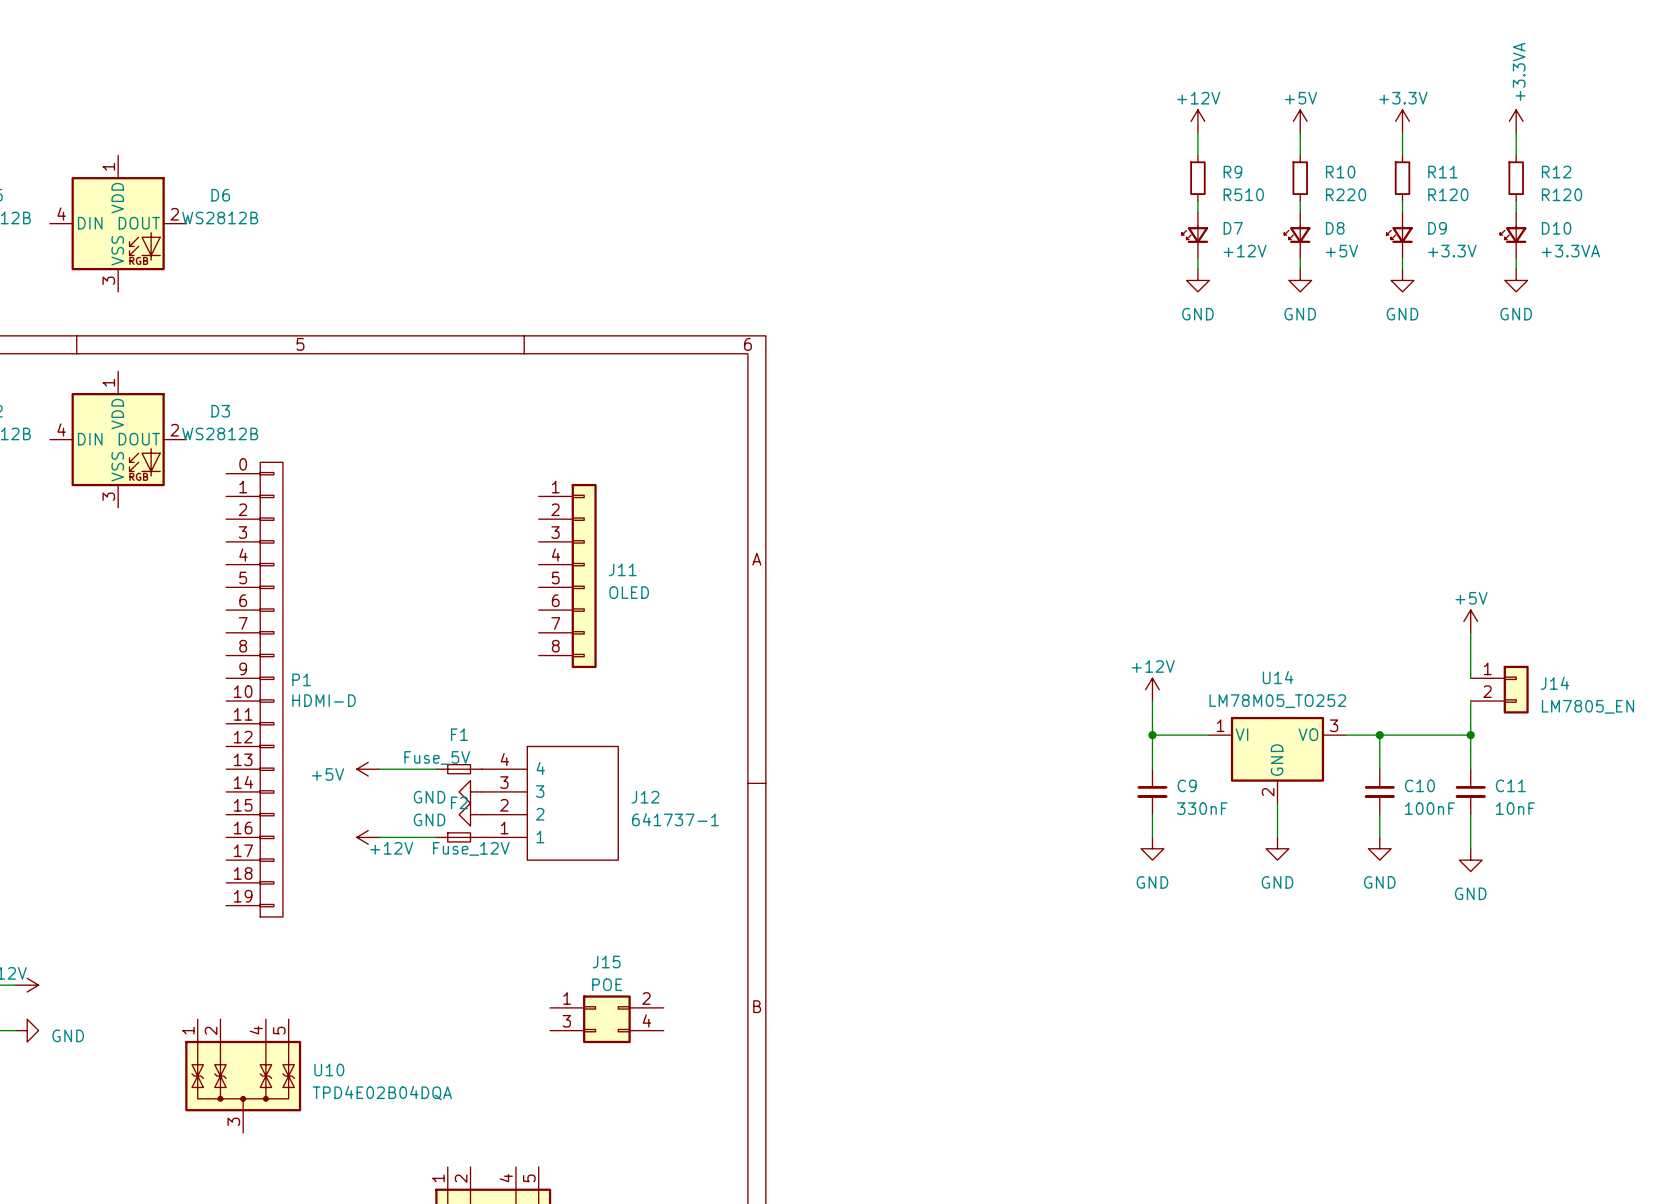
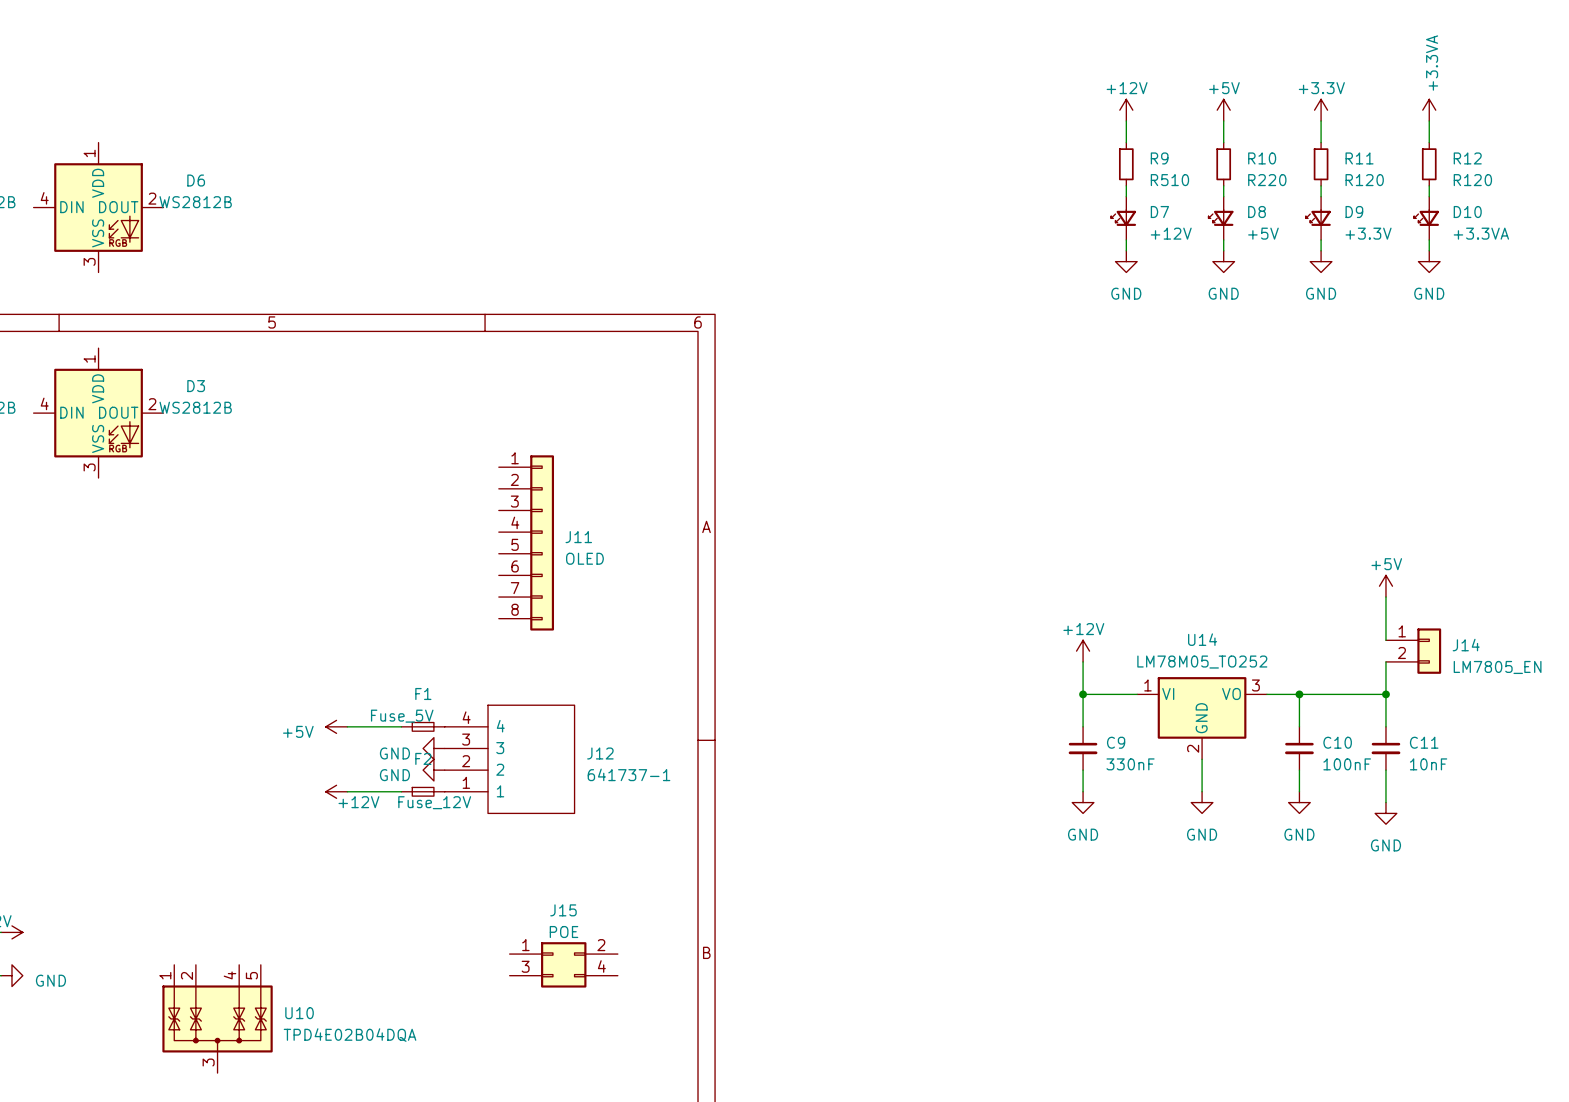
P1: HDMI-D (254, 689) -> none

